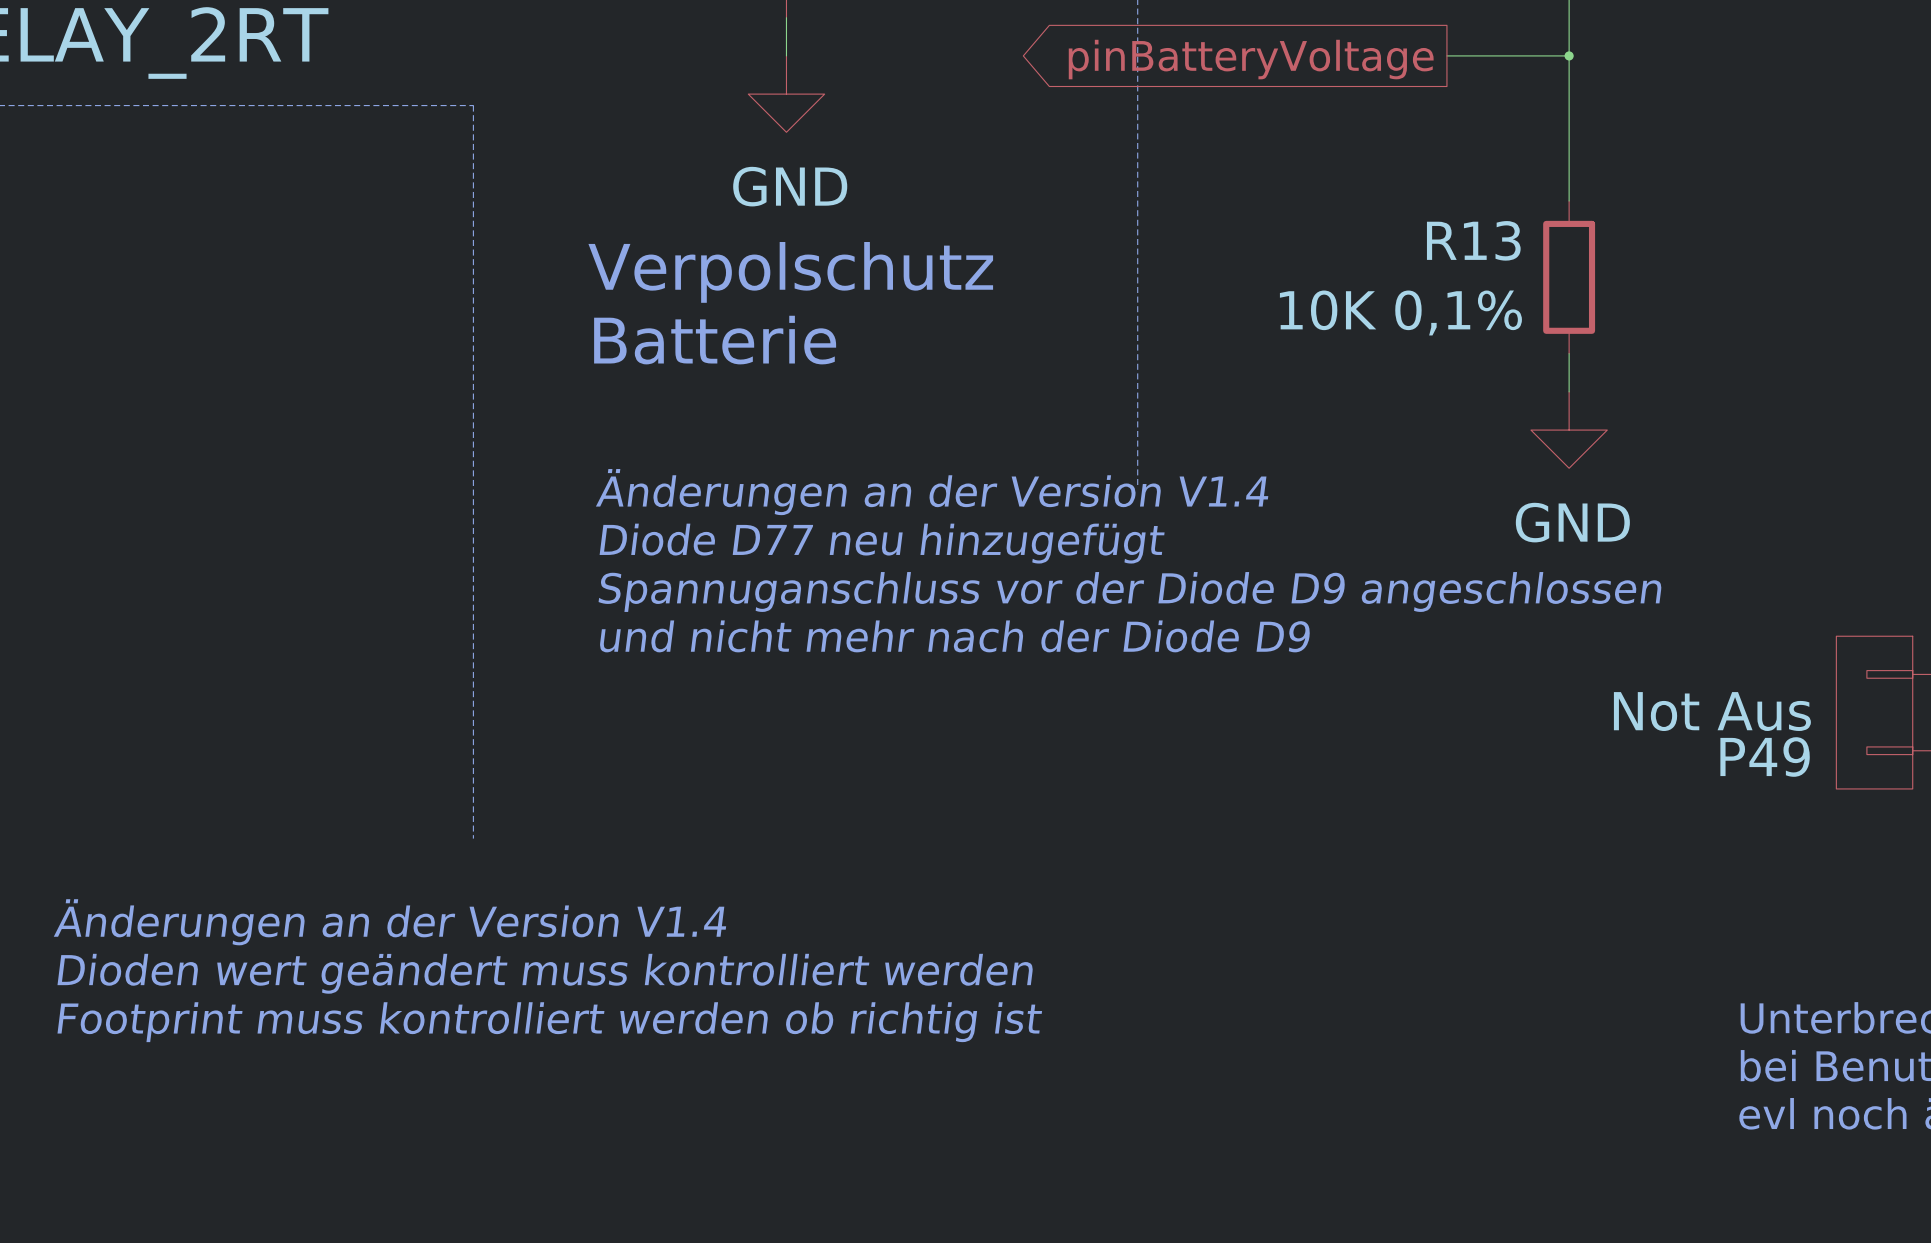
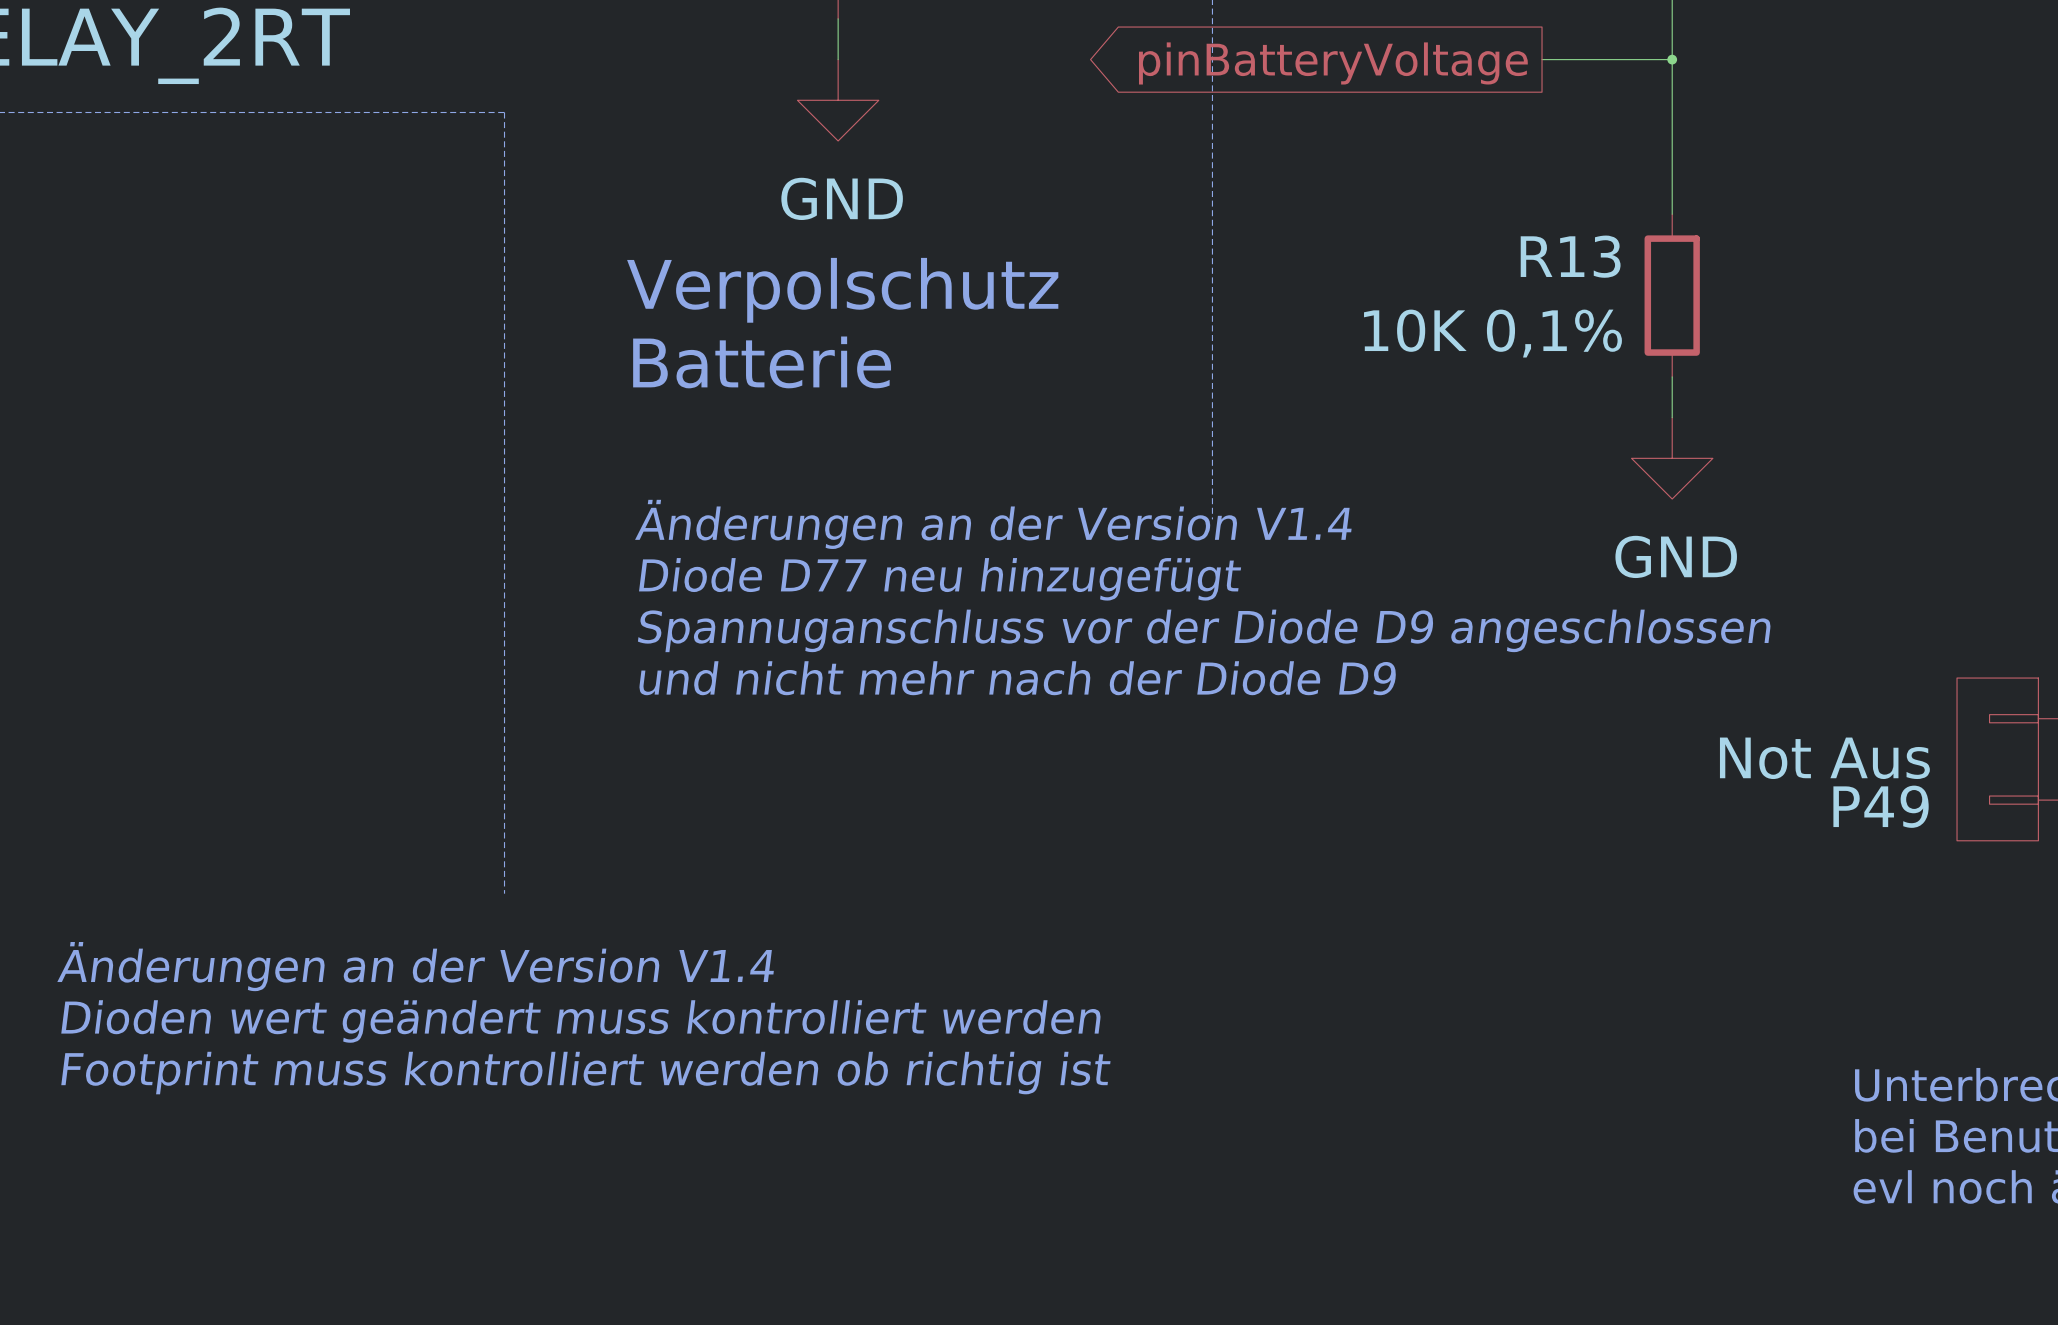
text position: Änderungen an der Version V1.4 (389, 922) -> Änderungen an der Version V1.4 (415, 966)
text position: Dioden wert geändert muss kontrolliert werden (545, 973) -> Dioden wert geändert muss kontrolliert werden (581, 1021)
text position: Footprint muss kontrolliert werden ob richtig ist (549, 1022) -> Footprint muss kontrolliert werden ob richtig ist (585, 1073)

